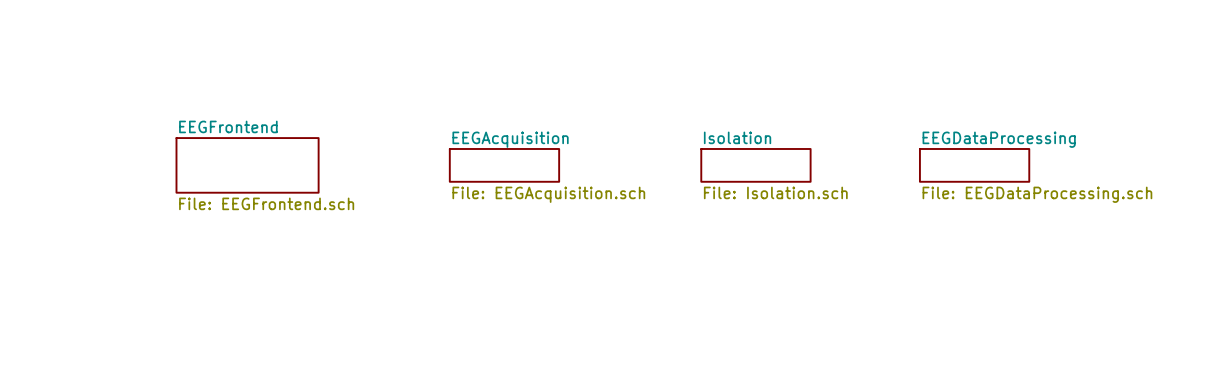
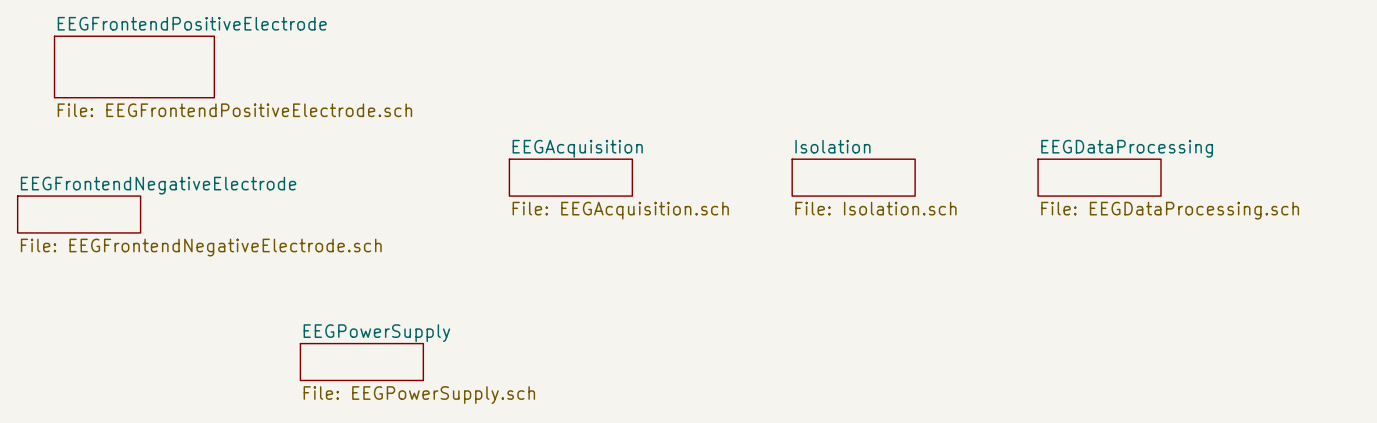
sheet EEGFrontendPositiveElectrode: none -> File: EEGFrontendPositiveElectrode.sch (134, 66)
sheet EEGFrontend: File: EEGFrontend.sch (247, 165) -> none
sheet EEGFrontendNegativeElectrode: none -> File: EEGFrontendNegativeElectrode.sch (79, 214)
sheet EEGPowerSupply: none -> File: EEGPowerSupply.sch (361, 362)

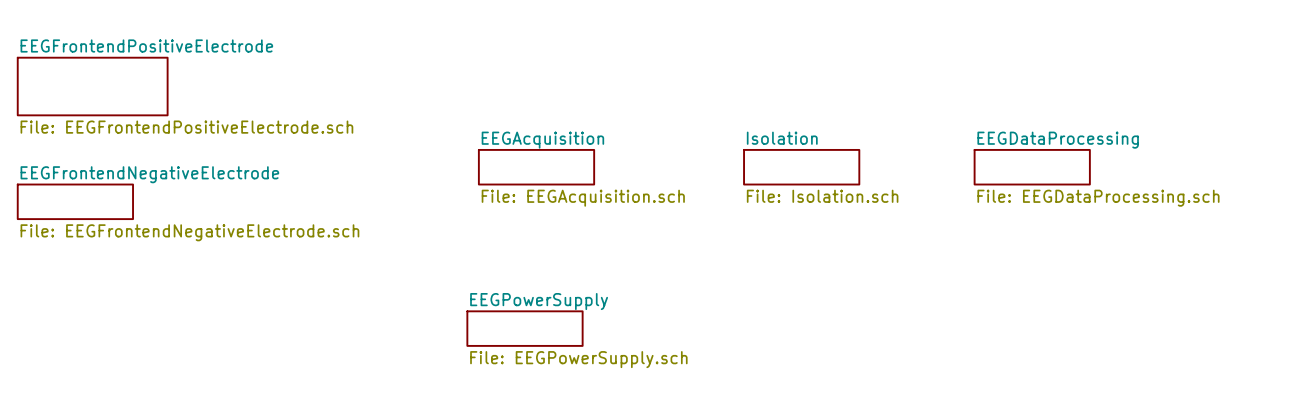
sheet EEGFrontendPositiveElectrode position: (134, 66) -> (92, 86)
sheet EEGPowerSupply position: (361, 362) -> (524, 328)

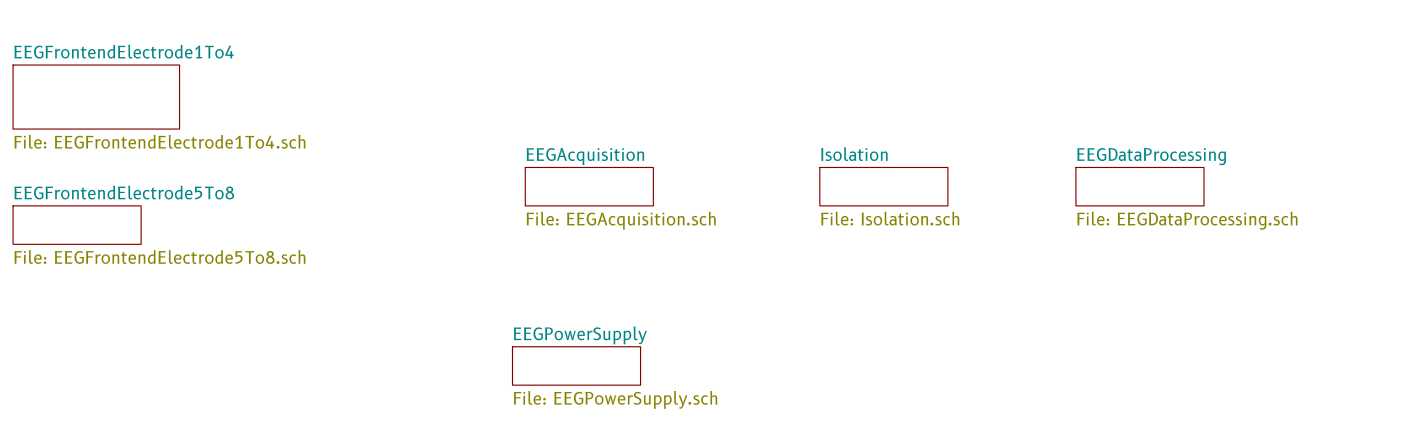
sheet EEGFrontendPositiveElectrode name: EEGFrontendPositiveElectrode (146, 45) -> EEGFrontendElectrode1To4 (124, 51)
sheet EEGFrontendPositiveElectrode value: File: EEGFrontendPositiveElectrode.sch (186, 127) -> File: EEGFrontendElectrode1To4.sch (159, 141)
sheet EEGFrontendNegativeElectrode name: EEGFrontendNegativeElectrode (149, 174) -> EEGFrontendElectrode5To8 (124, 192)
sheet EEGFrontendNegativeElectrode value: File: EEGFrontendNegativeElectrode.sch (189, 232) -> File: EEGFrontendElectrode5To8.sch (159, 257)

